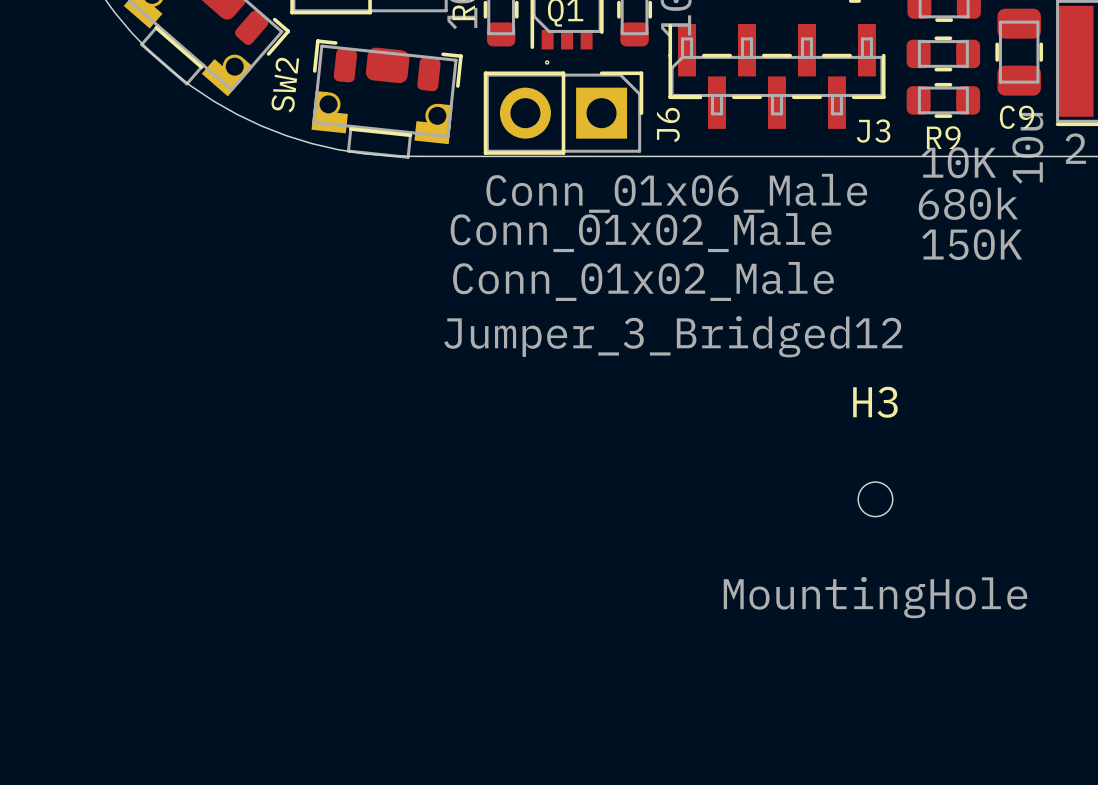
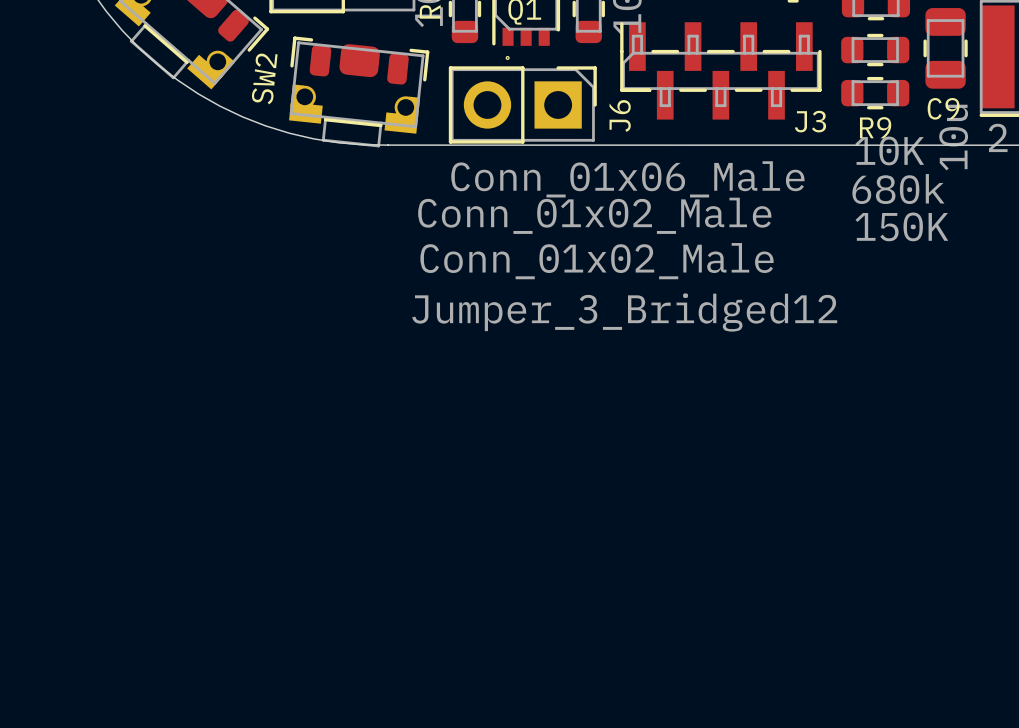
H3: MountingHole (875, 499) -> none

